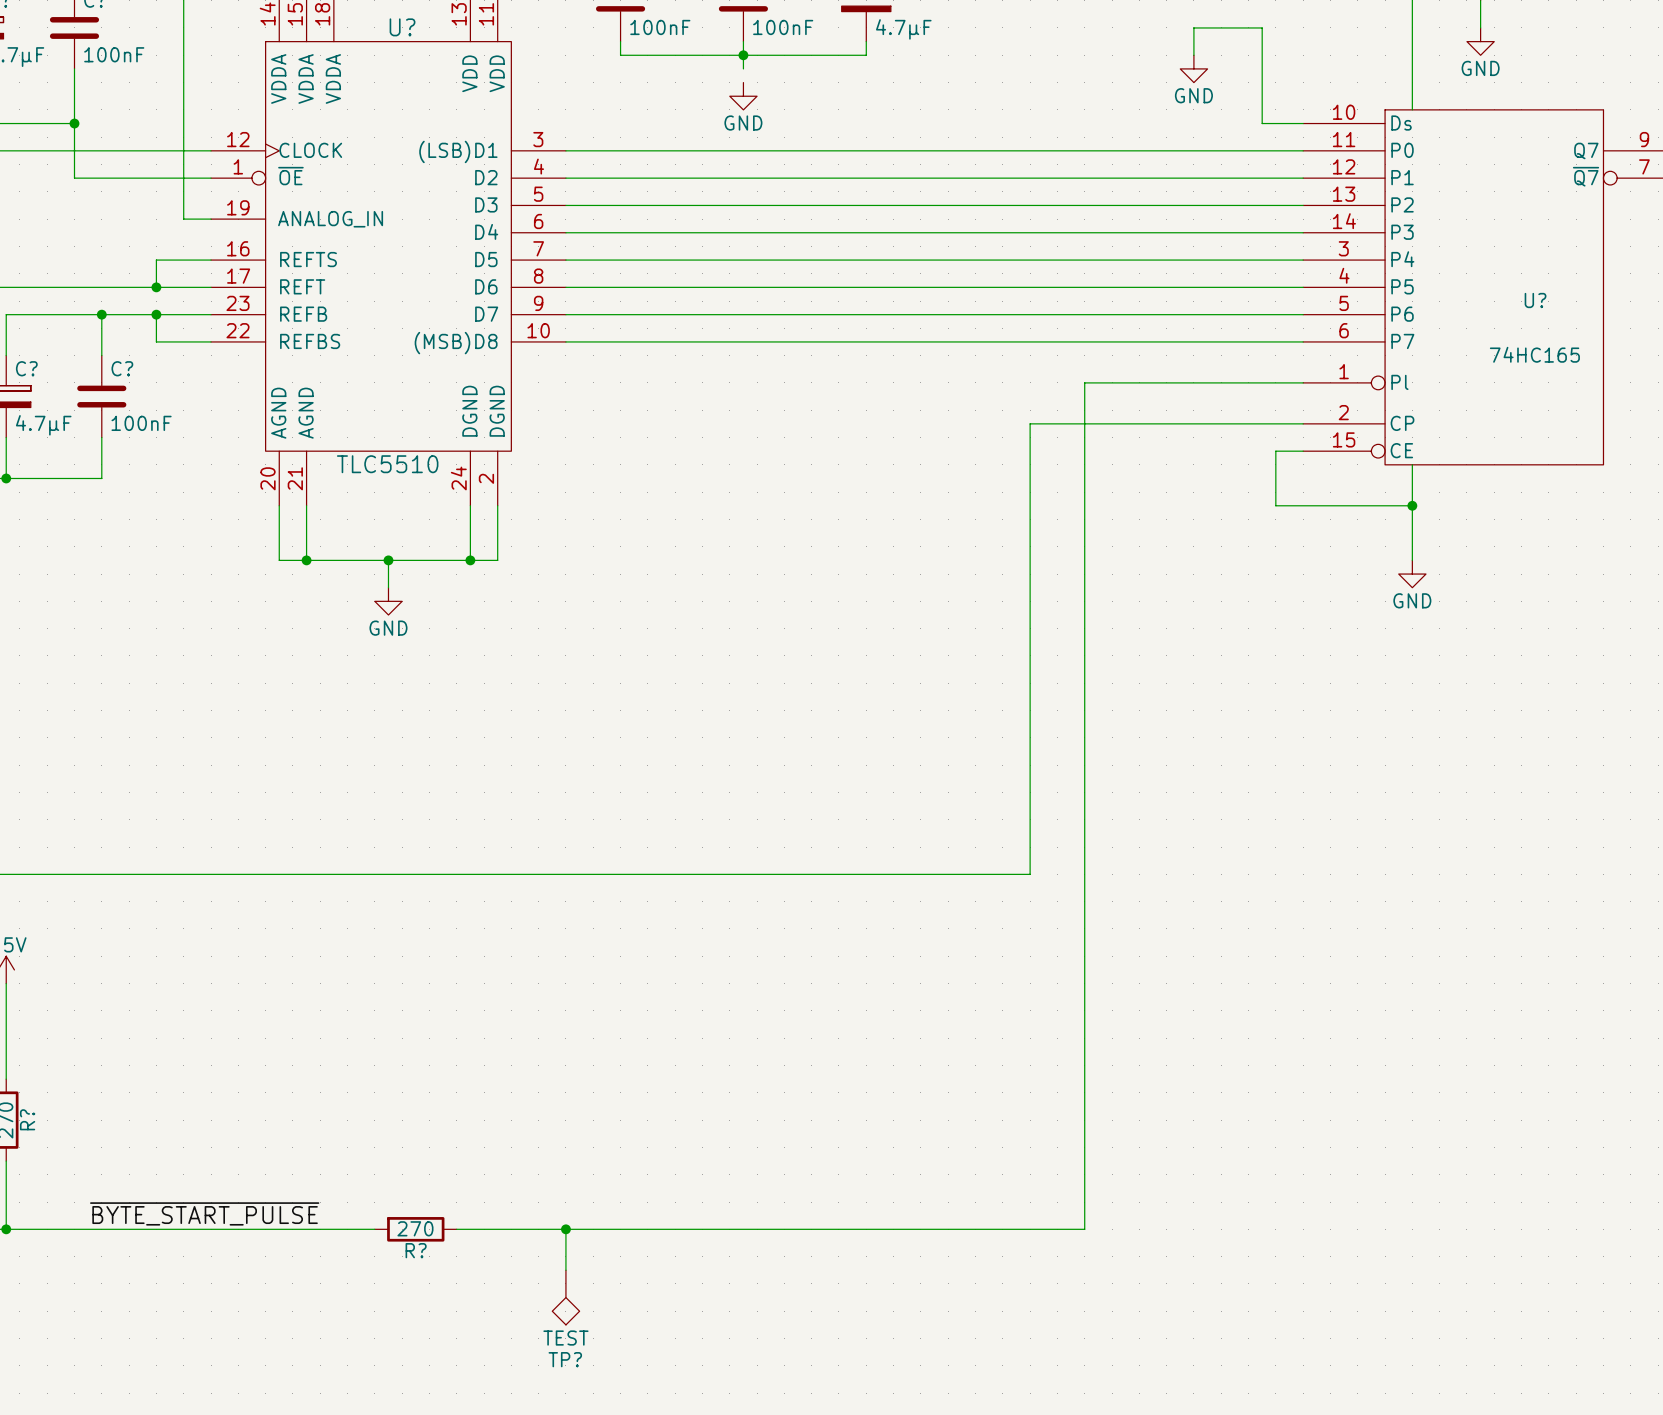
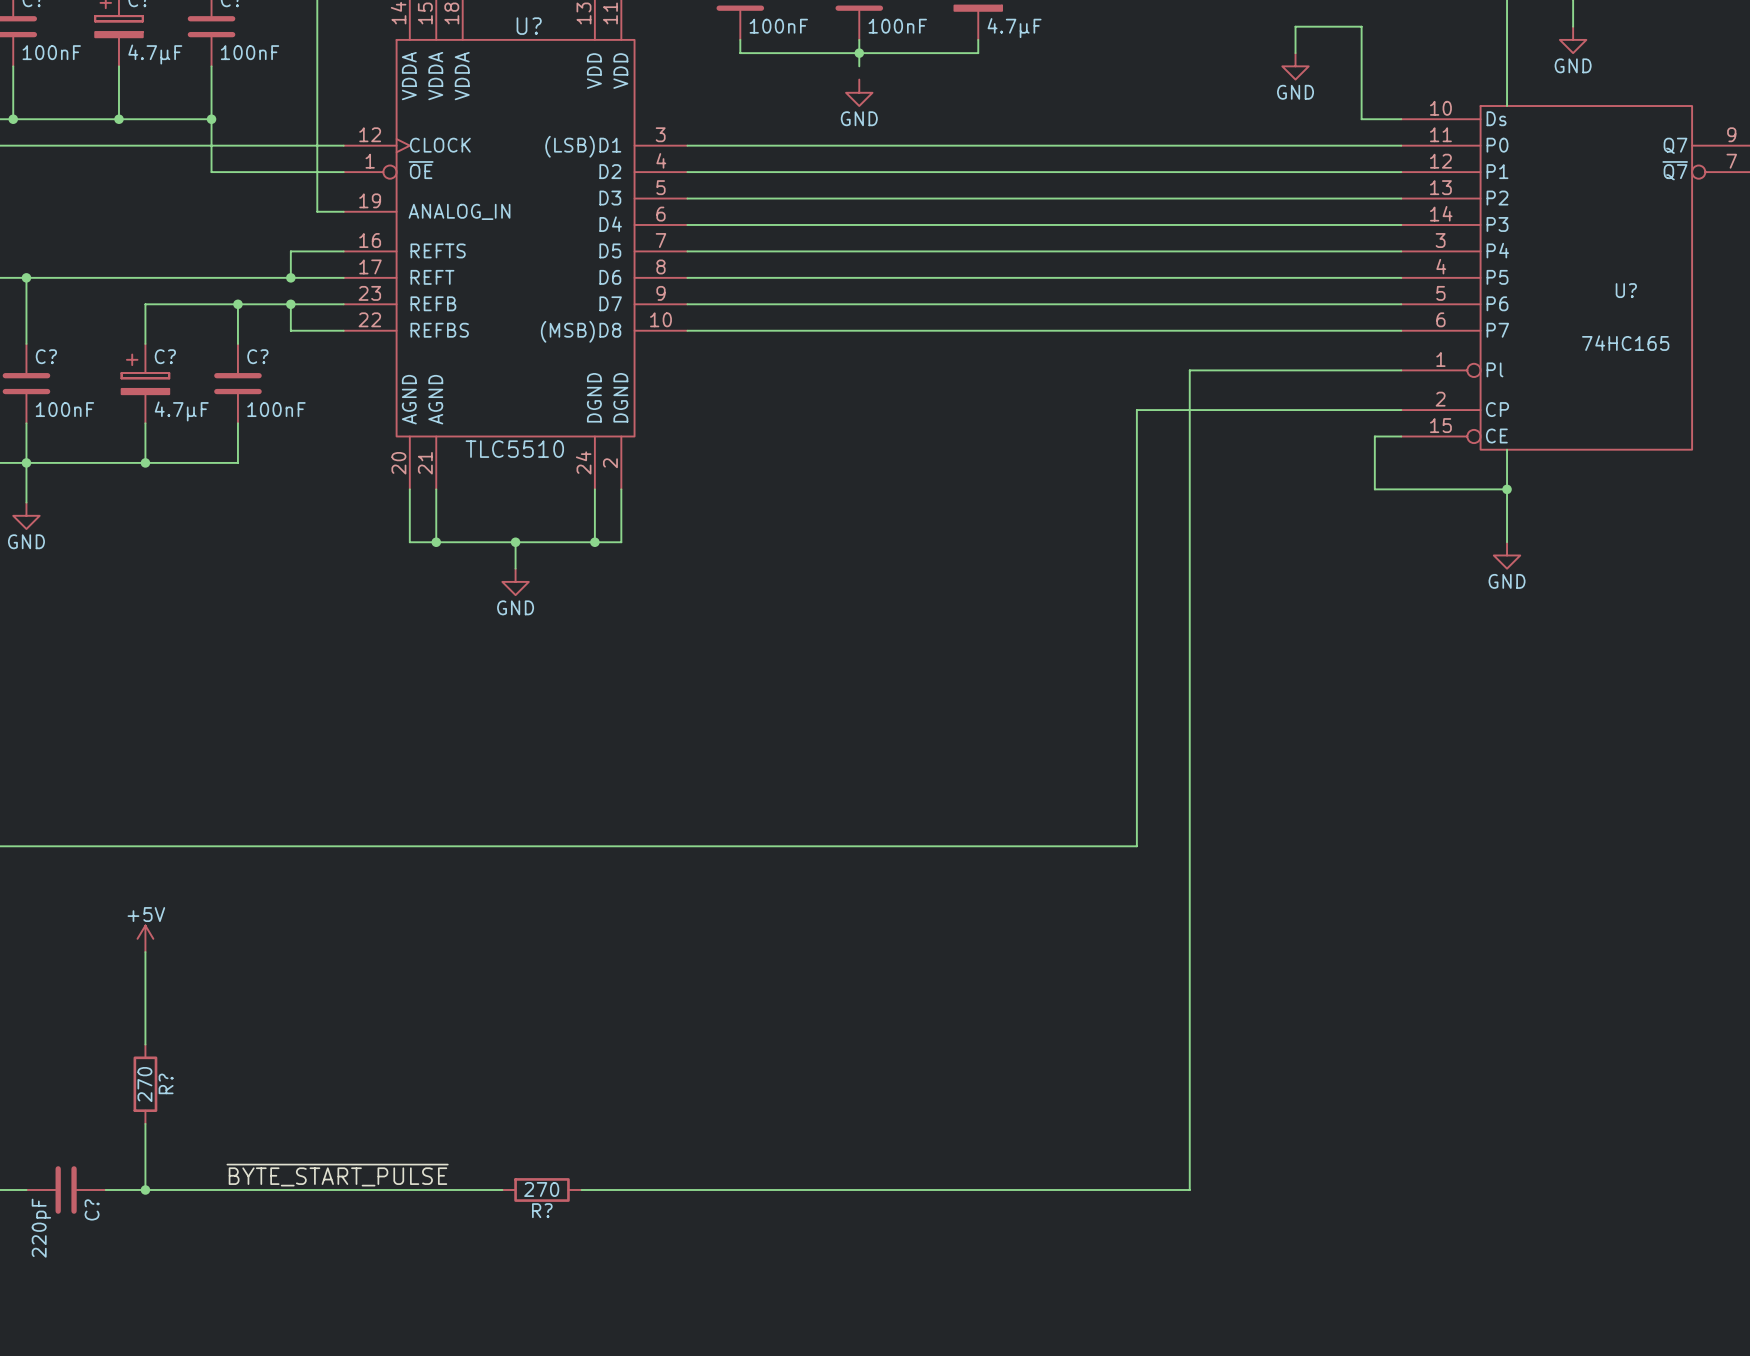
wire: (565, 1229) (565, 1270) -> none
junction: (565, 1229) -> none
TP?: TEST (565, 1297) -> none

